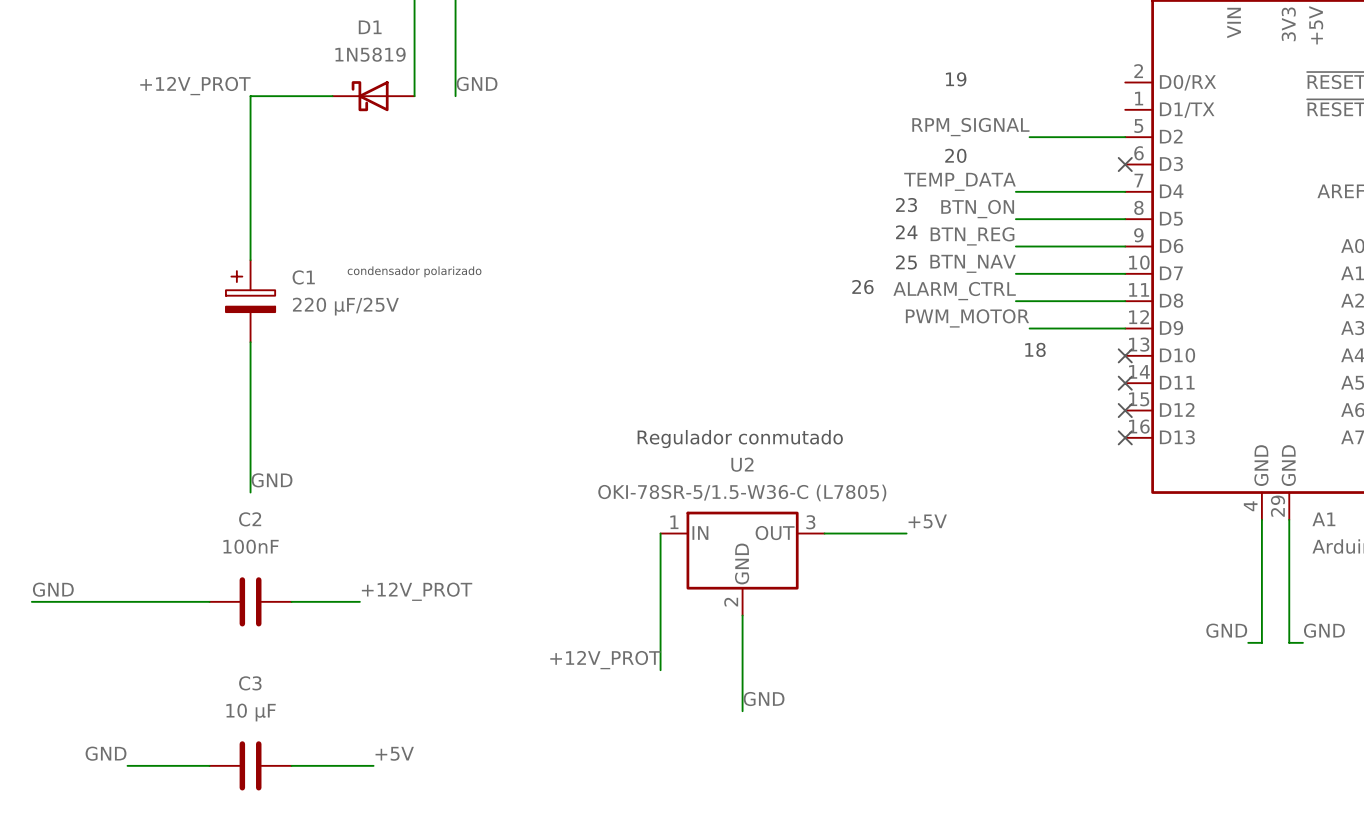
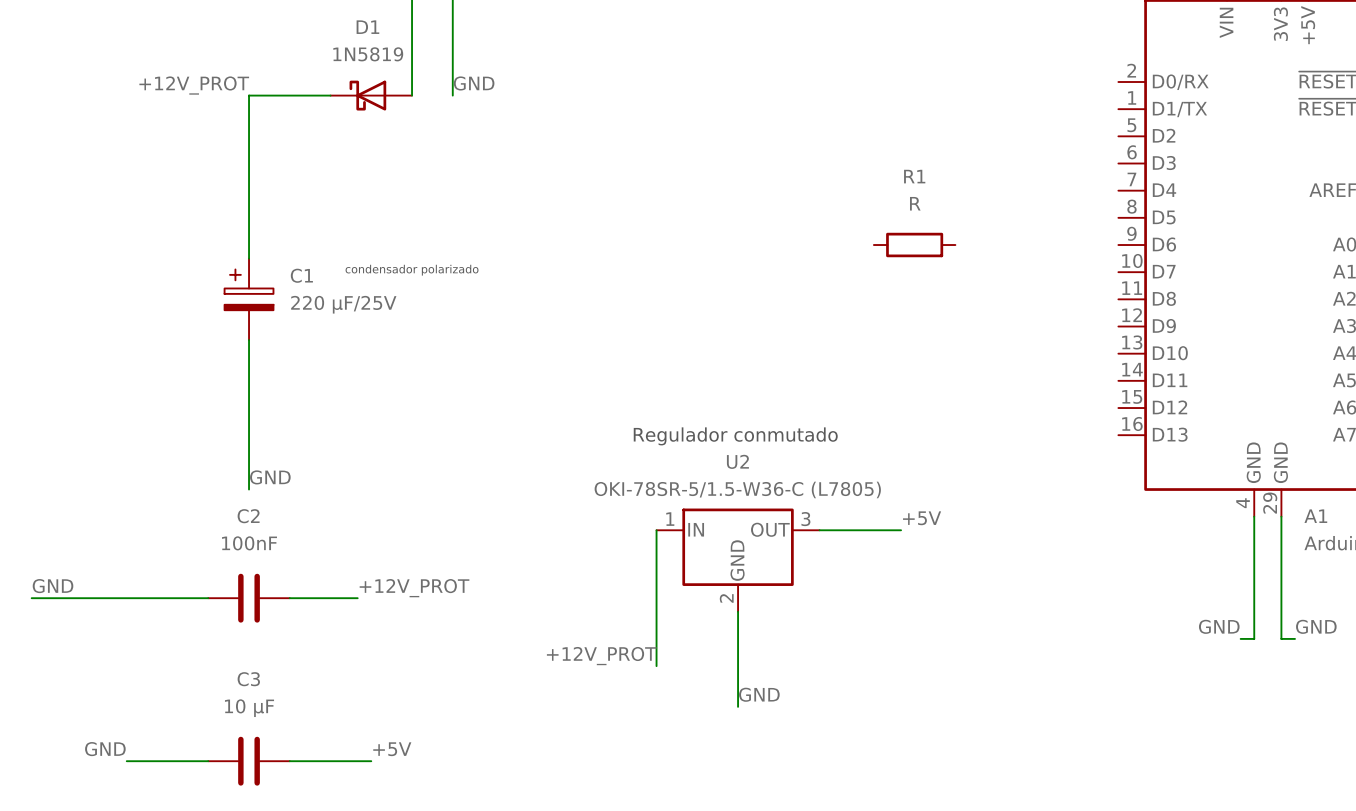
text: 19 (956, 79) -> none
label: RPM_SIGNAL (970, 127) -> none
wire: (1029, 137) (1125, 137) -> none
text: 20 (955, 155) -> none
no-connect mark: (1125, 164) -> none
label: TEMP_DATA (959, 181) -> none
wire: (1015, 191) (1125, 191) -> none
text: 23 (906, 205) -> none
label: BTN_ON (977, 209) -> none
wire: (1015, 219) (1125, 219) -> none
text: 24 (906, 232) -> none
label: BTN_REG (972, 236) -> none
R1: none -> R (914, 245)
wire: (1015, 246) (1125, 246) -> none
text: 25 (906, 262) -> none
label: BTN_NAV (973, 263) -> none
wire: (1015, 273) (1125, 273) -> none
text: 26 (862, 287) -> none
label: ALARM_CTRL (954, 291) -> none
wire: (1015, 301) (1125, 301) -> none
label: PWM_MOTOR (967, 318) -> none
wire: (1029, 328) (1125, 328) -> none
text: 18 (1035, 349) -> none
no-connect mark: (1125, 355) -> none
no-connect mark: (1125, 383) -> none
no-connect mark: (1125, 410) -> none
no-connect mark: (1125, 437) -> none

